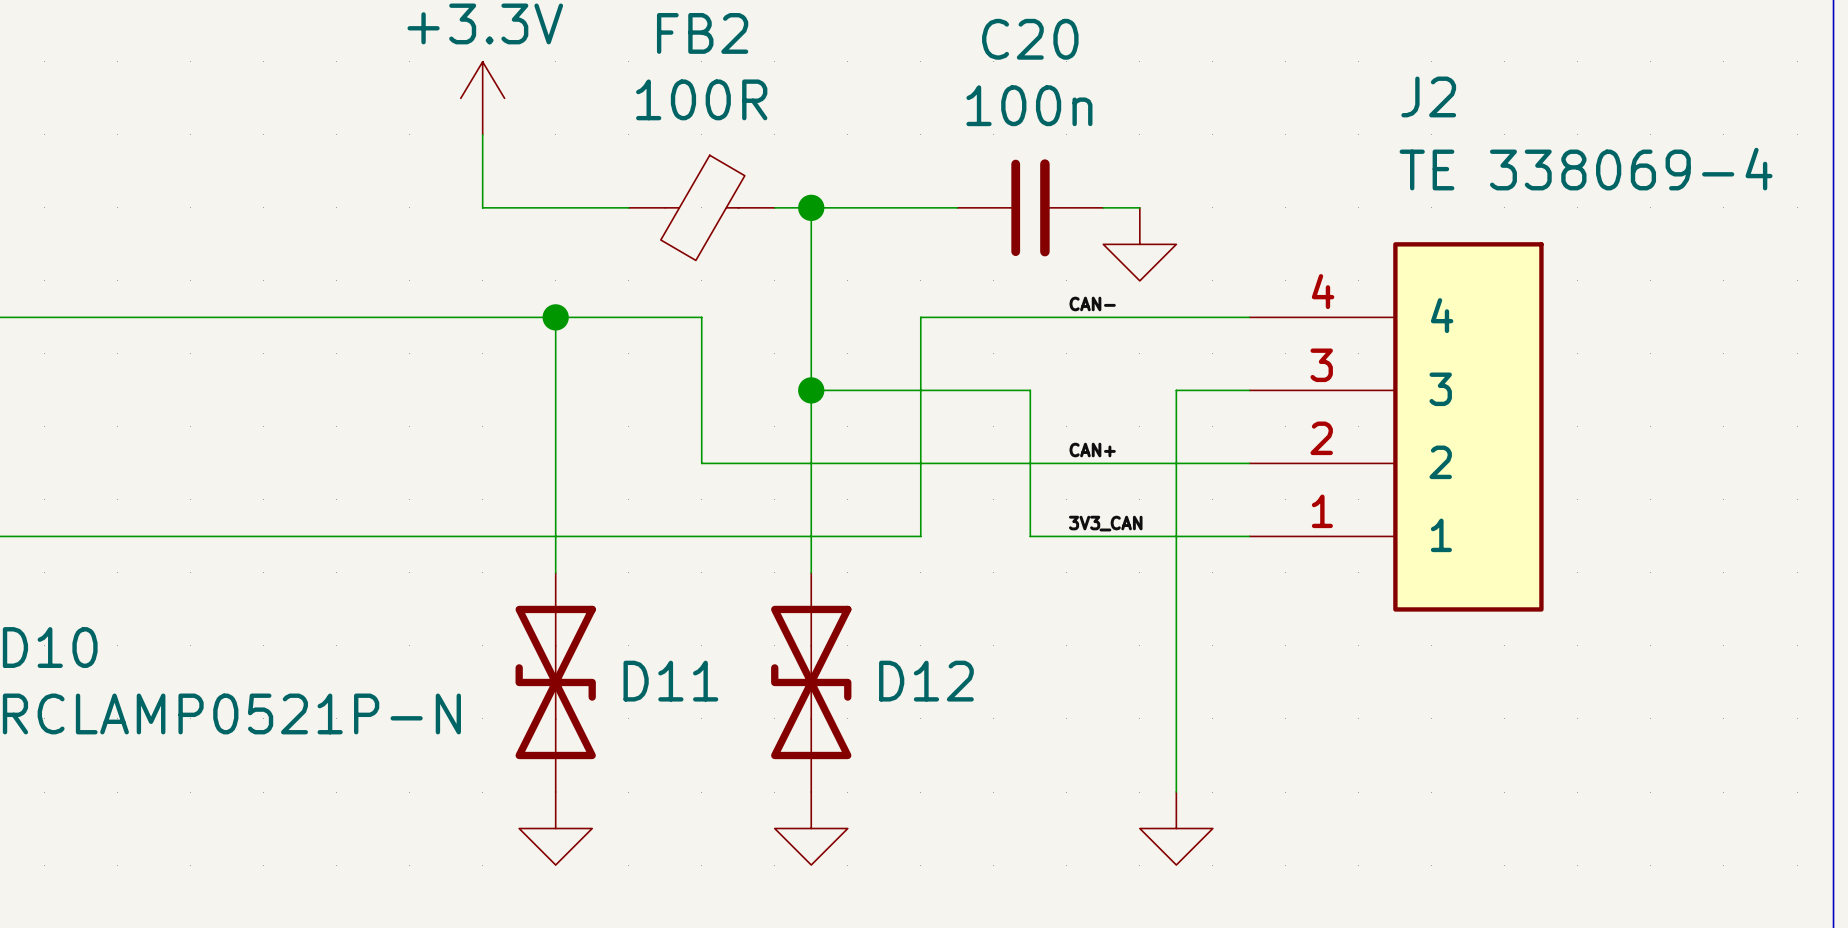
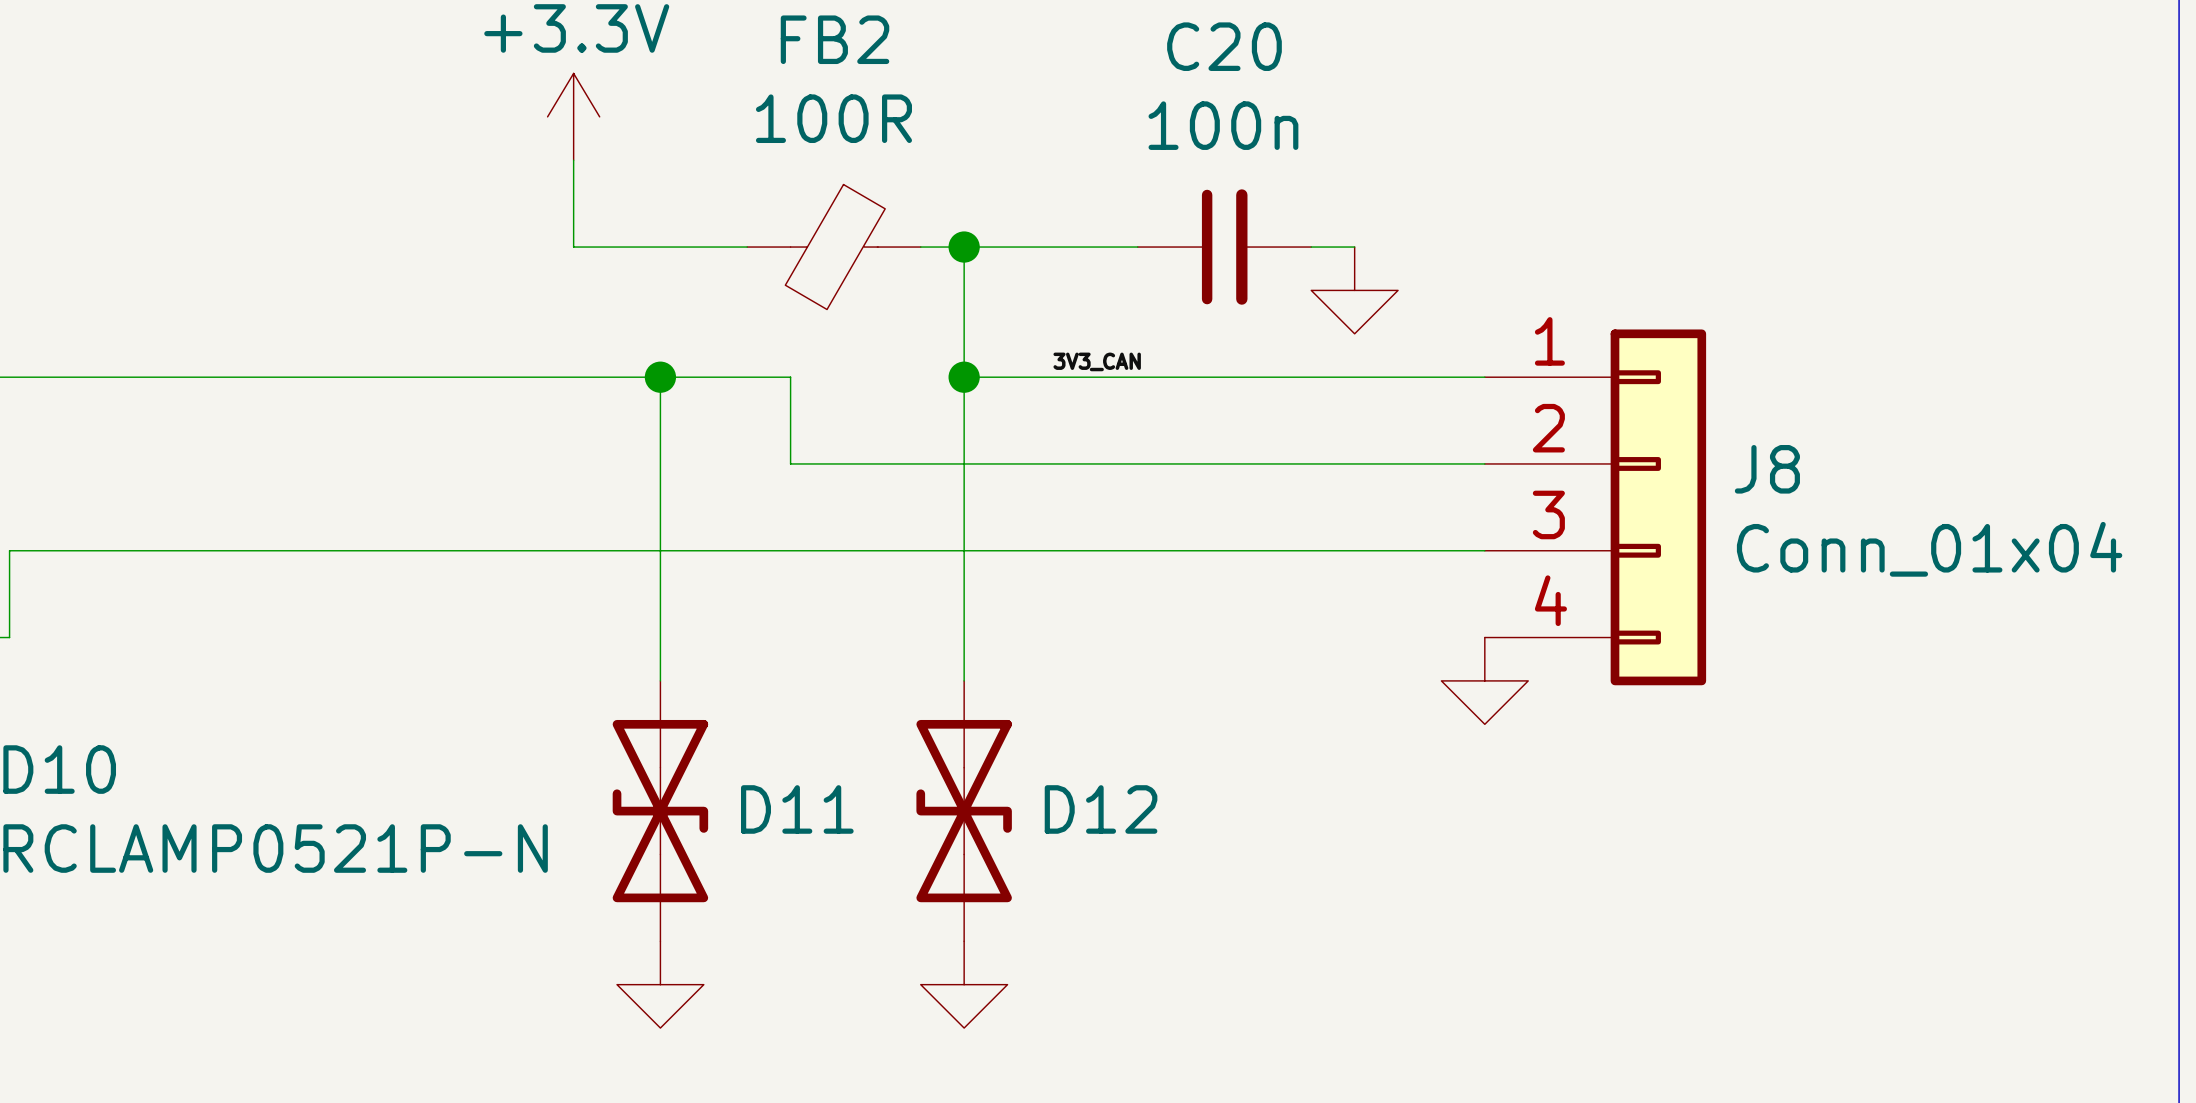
label: CAN- (1092, 303) -> none
wire: (665, 317) (701, 317) (701, 463) -> (790, 377) (790, 463) (964, 463)
wire: none -> (964, 377) (1094, 377)
wire: (920, 317) (920, 536) (8, 536) -> (833, 550) (9, 550) (9, 637)
junction position: (811, 390) -> (964, 377)
wire: (1030, 390) (1030, 536) (1249, 536) -> (1224, 463) (1398, 463)
wire: (1176, 390) (1176, 792) -> none
J8: none -> Conn_01x04 (1595, 507)
J2: TE 338069-4 (1396, 426) -> none
label: CAN+ (1092, 450) -> none
label position: 3V3_CAN (1105, 523) -> 3V3_CAN (1097, 361)
power symbol position: (1176, 828) -> (1484, 680)

